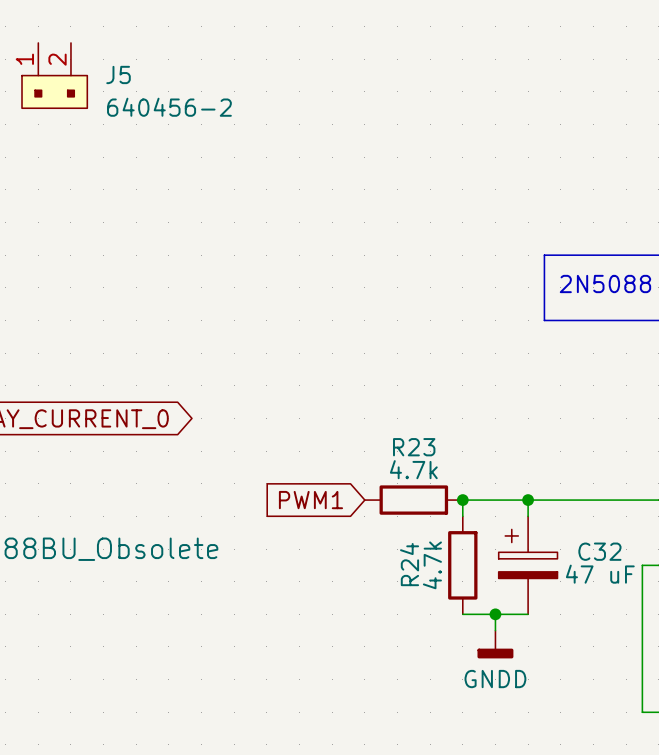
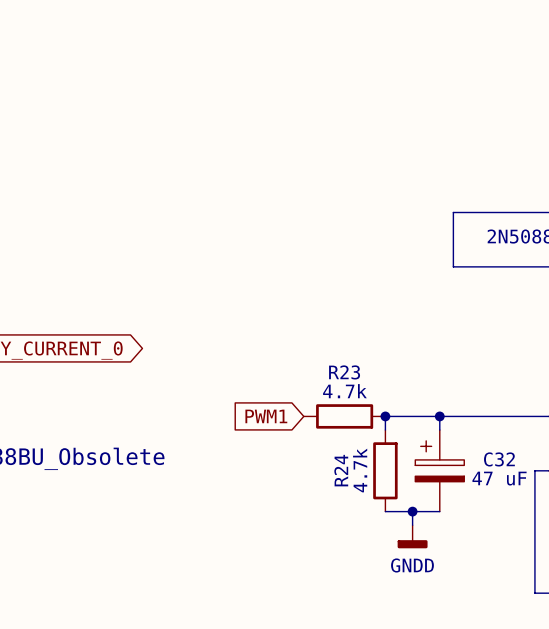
J5: 640456-2 (54, 75) -> none

